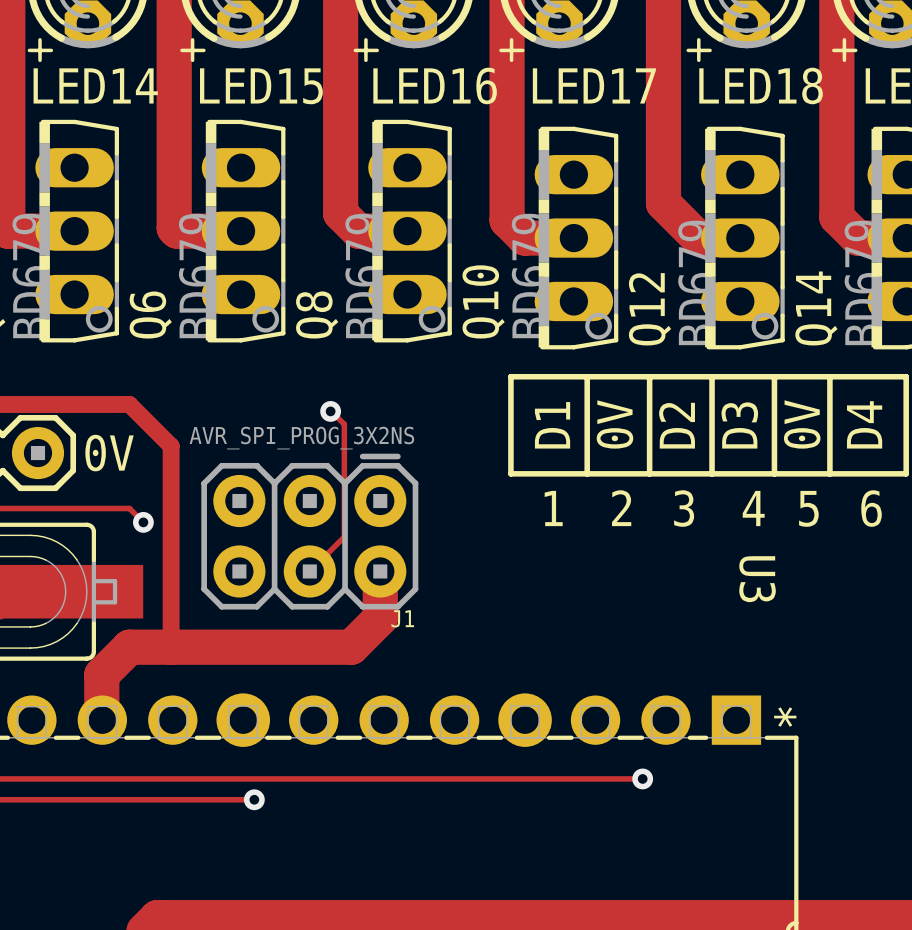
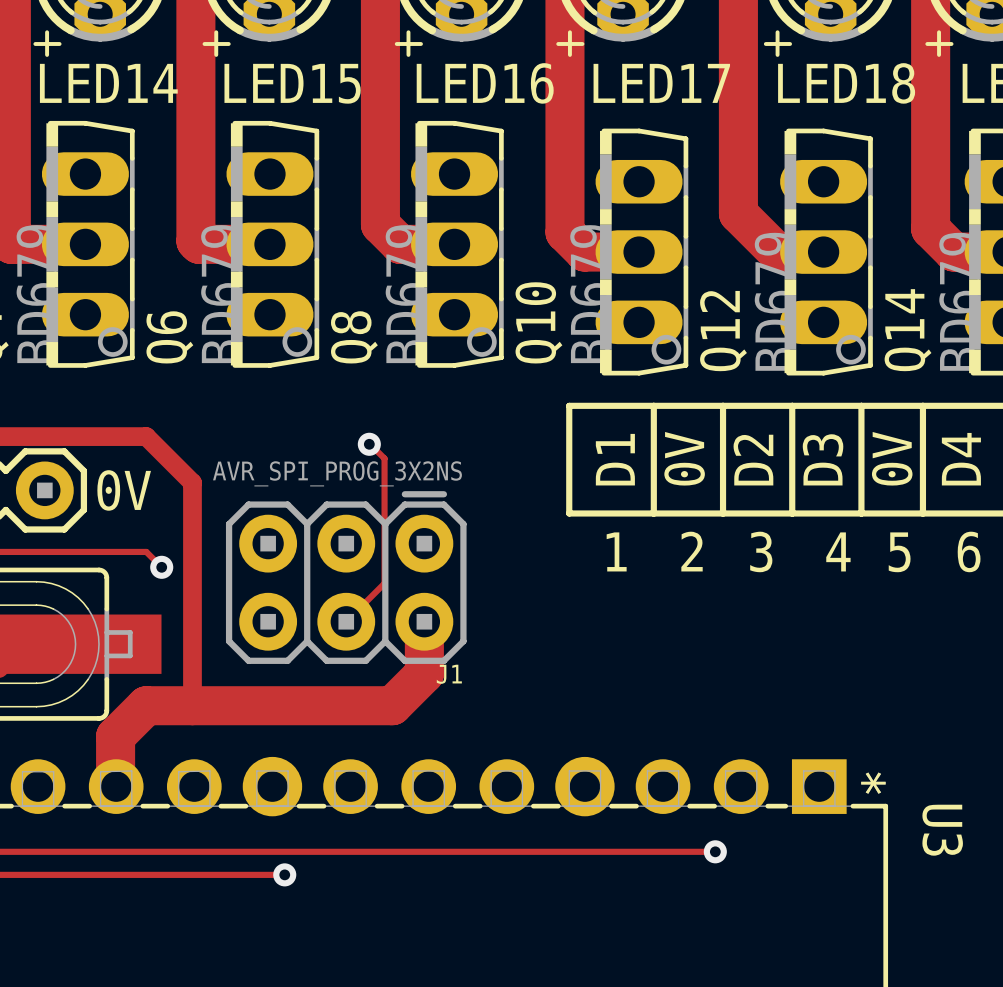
U3 name position: U3 (757, 579) -> U3 (942, 830)

